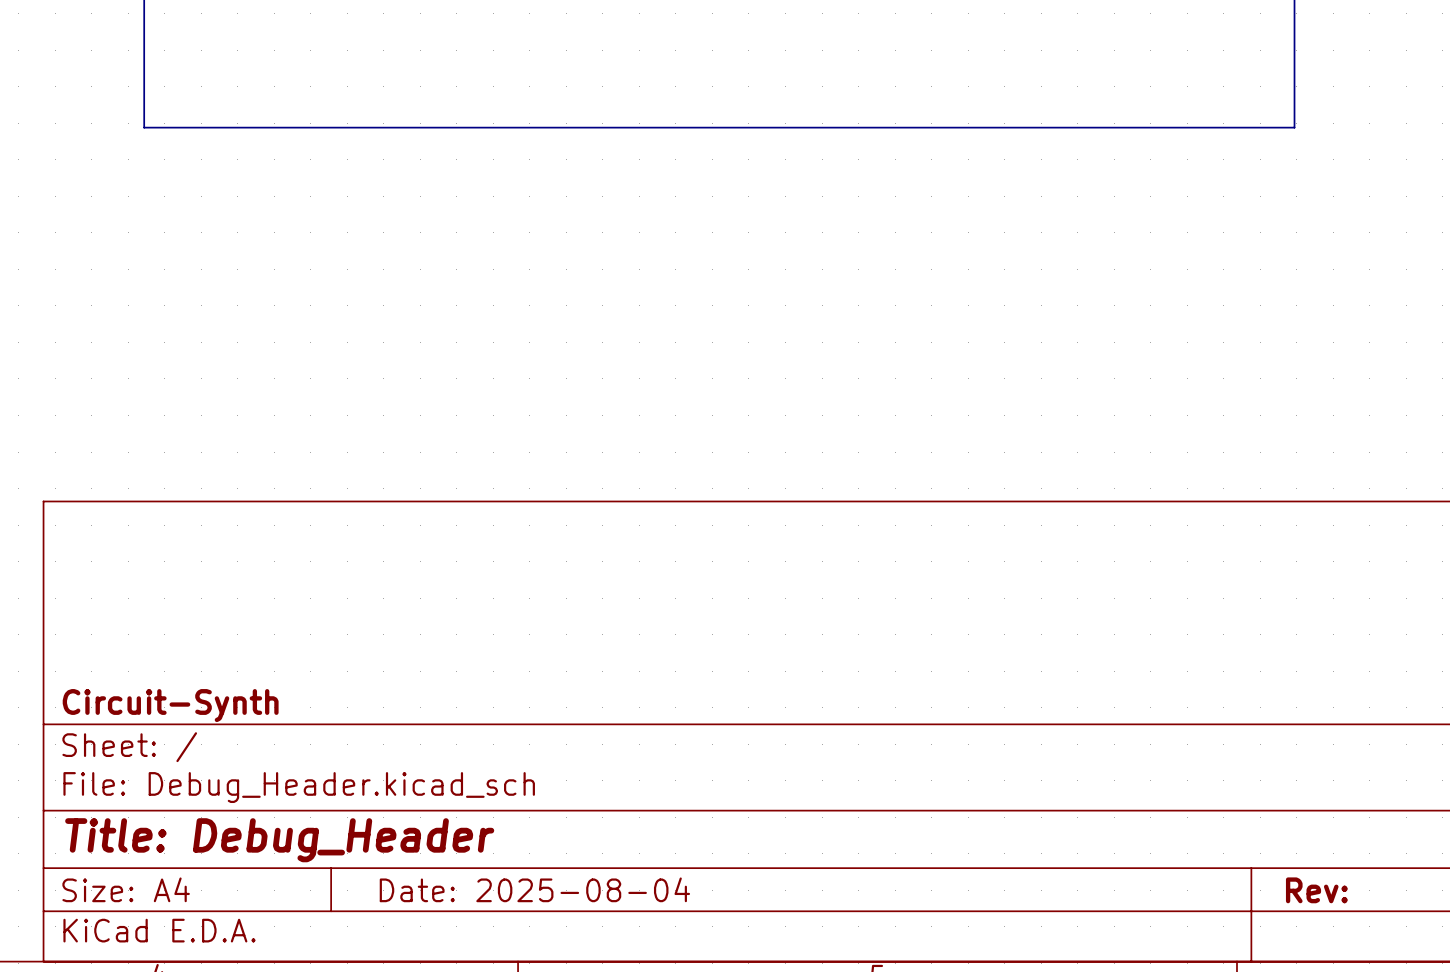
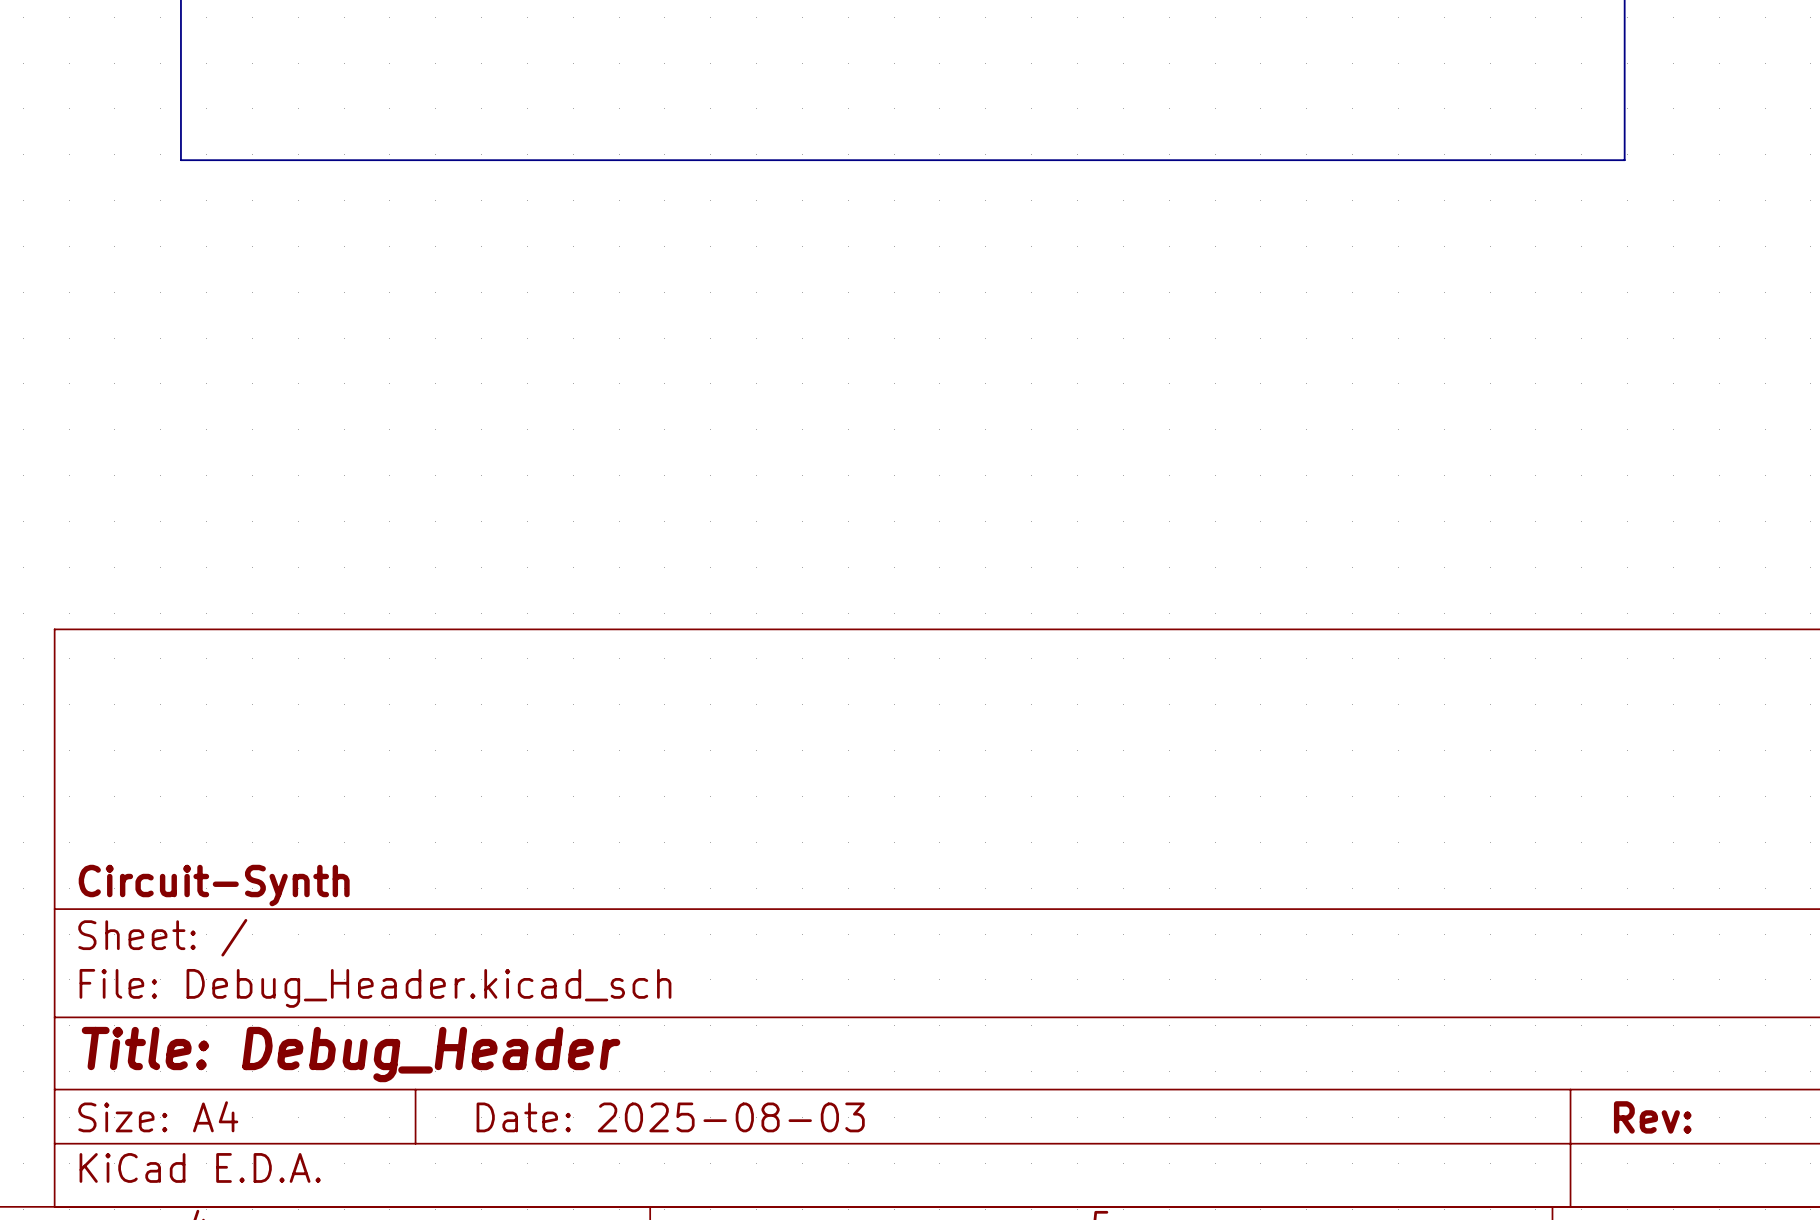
title block: Date: 2025-08-04 (534, 889) -> Date: 2025-08-03 (670, 1117)

